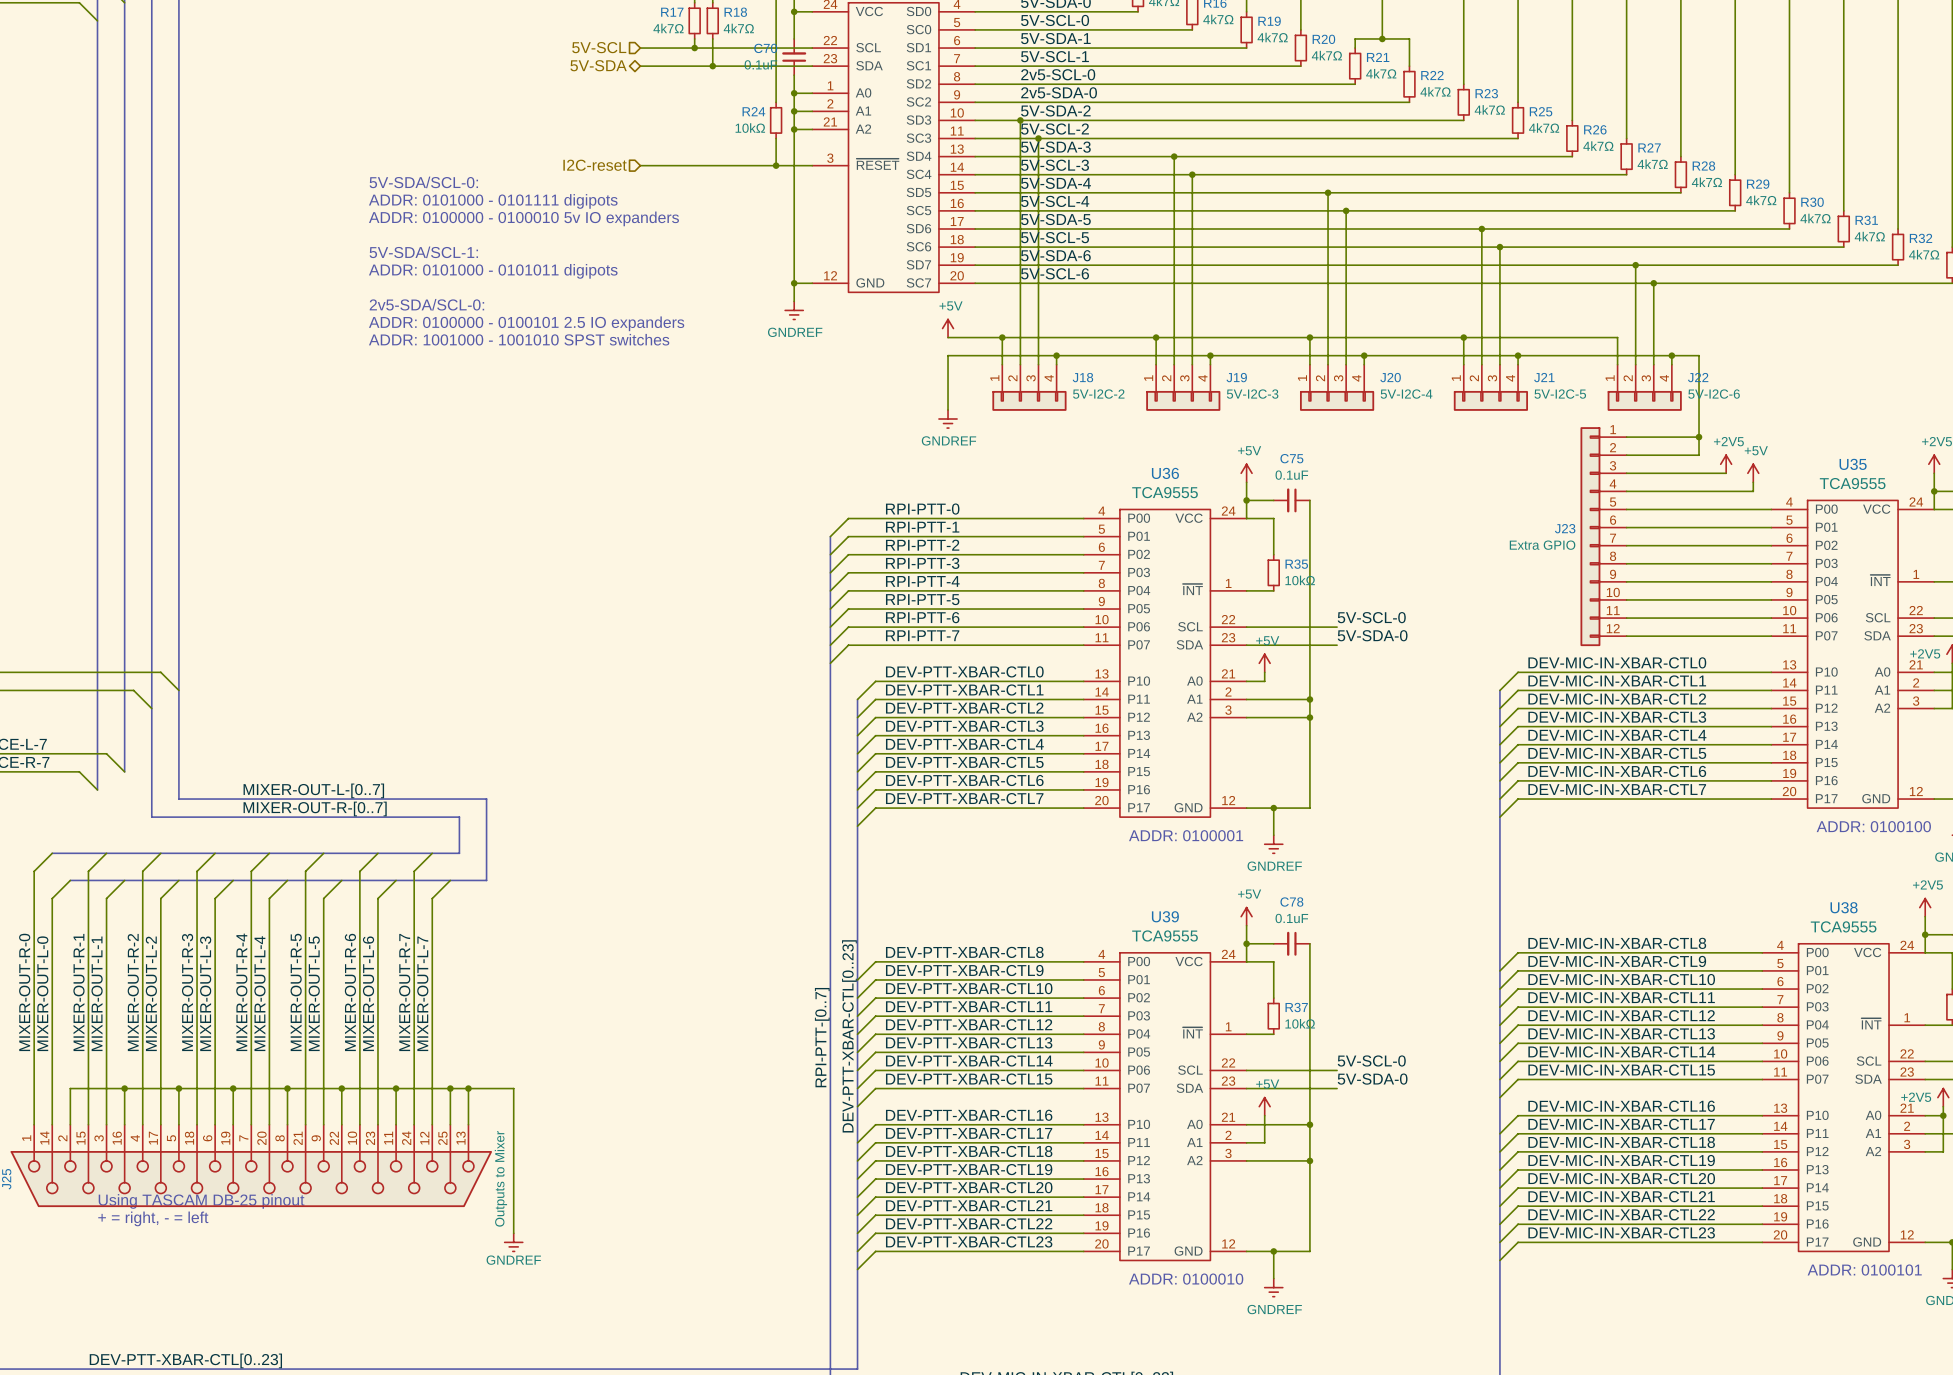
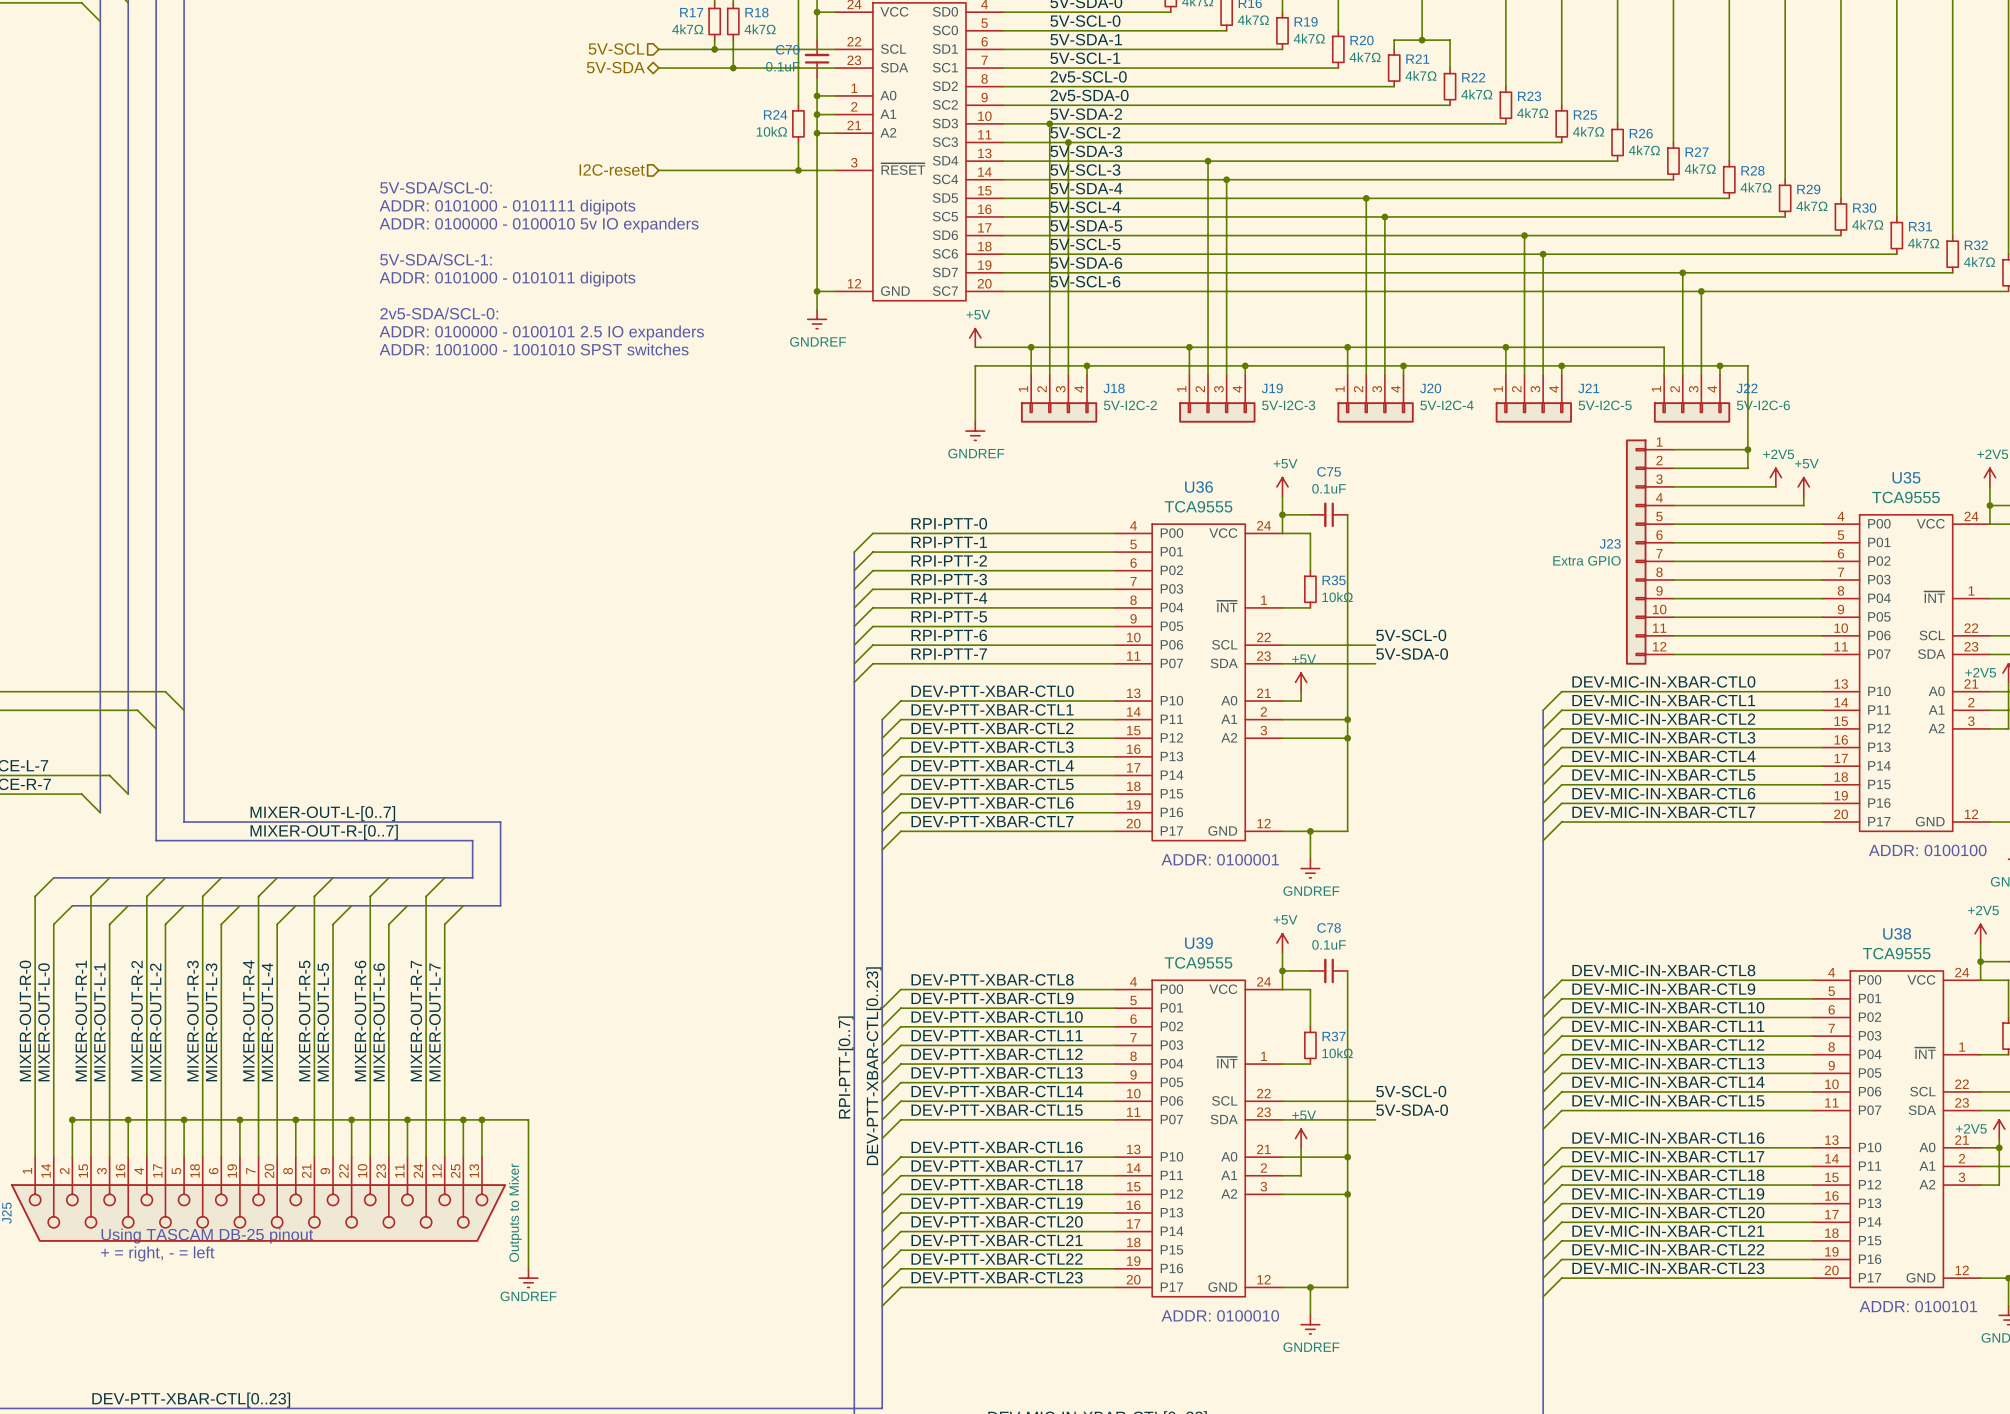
junction: none -> (72, 1119)

